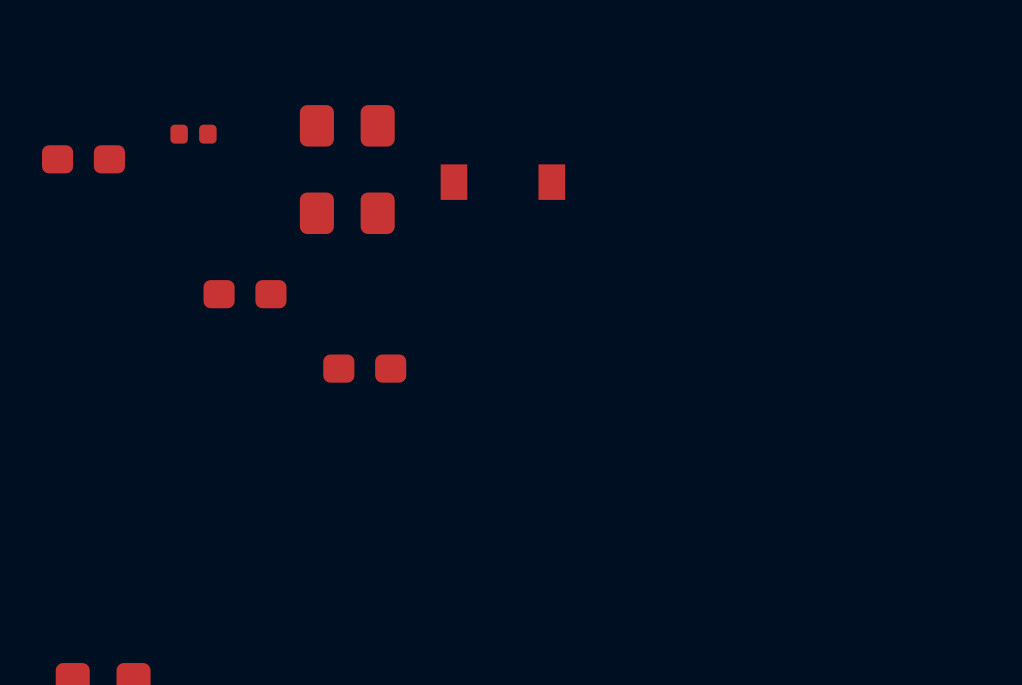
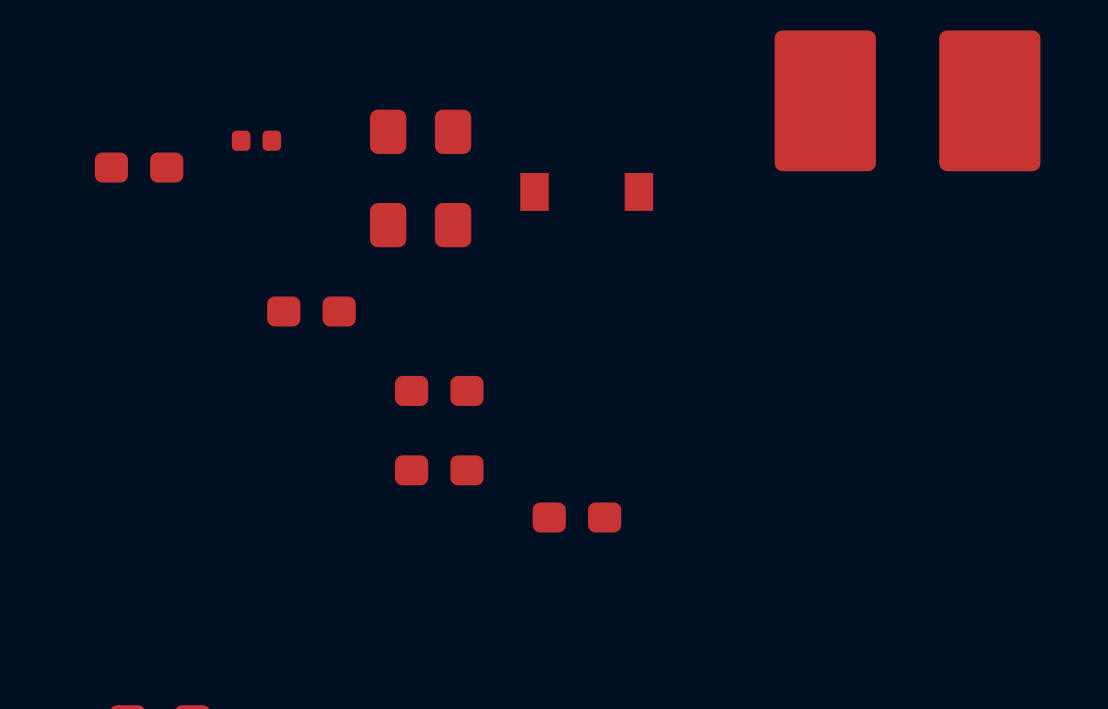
part: none -> (907, 100)
part: none -> (439, 470)
part: none -> (576, 517)

